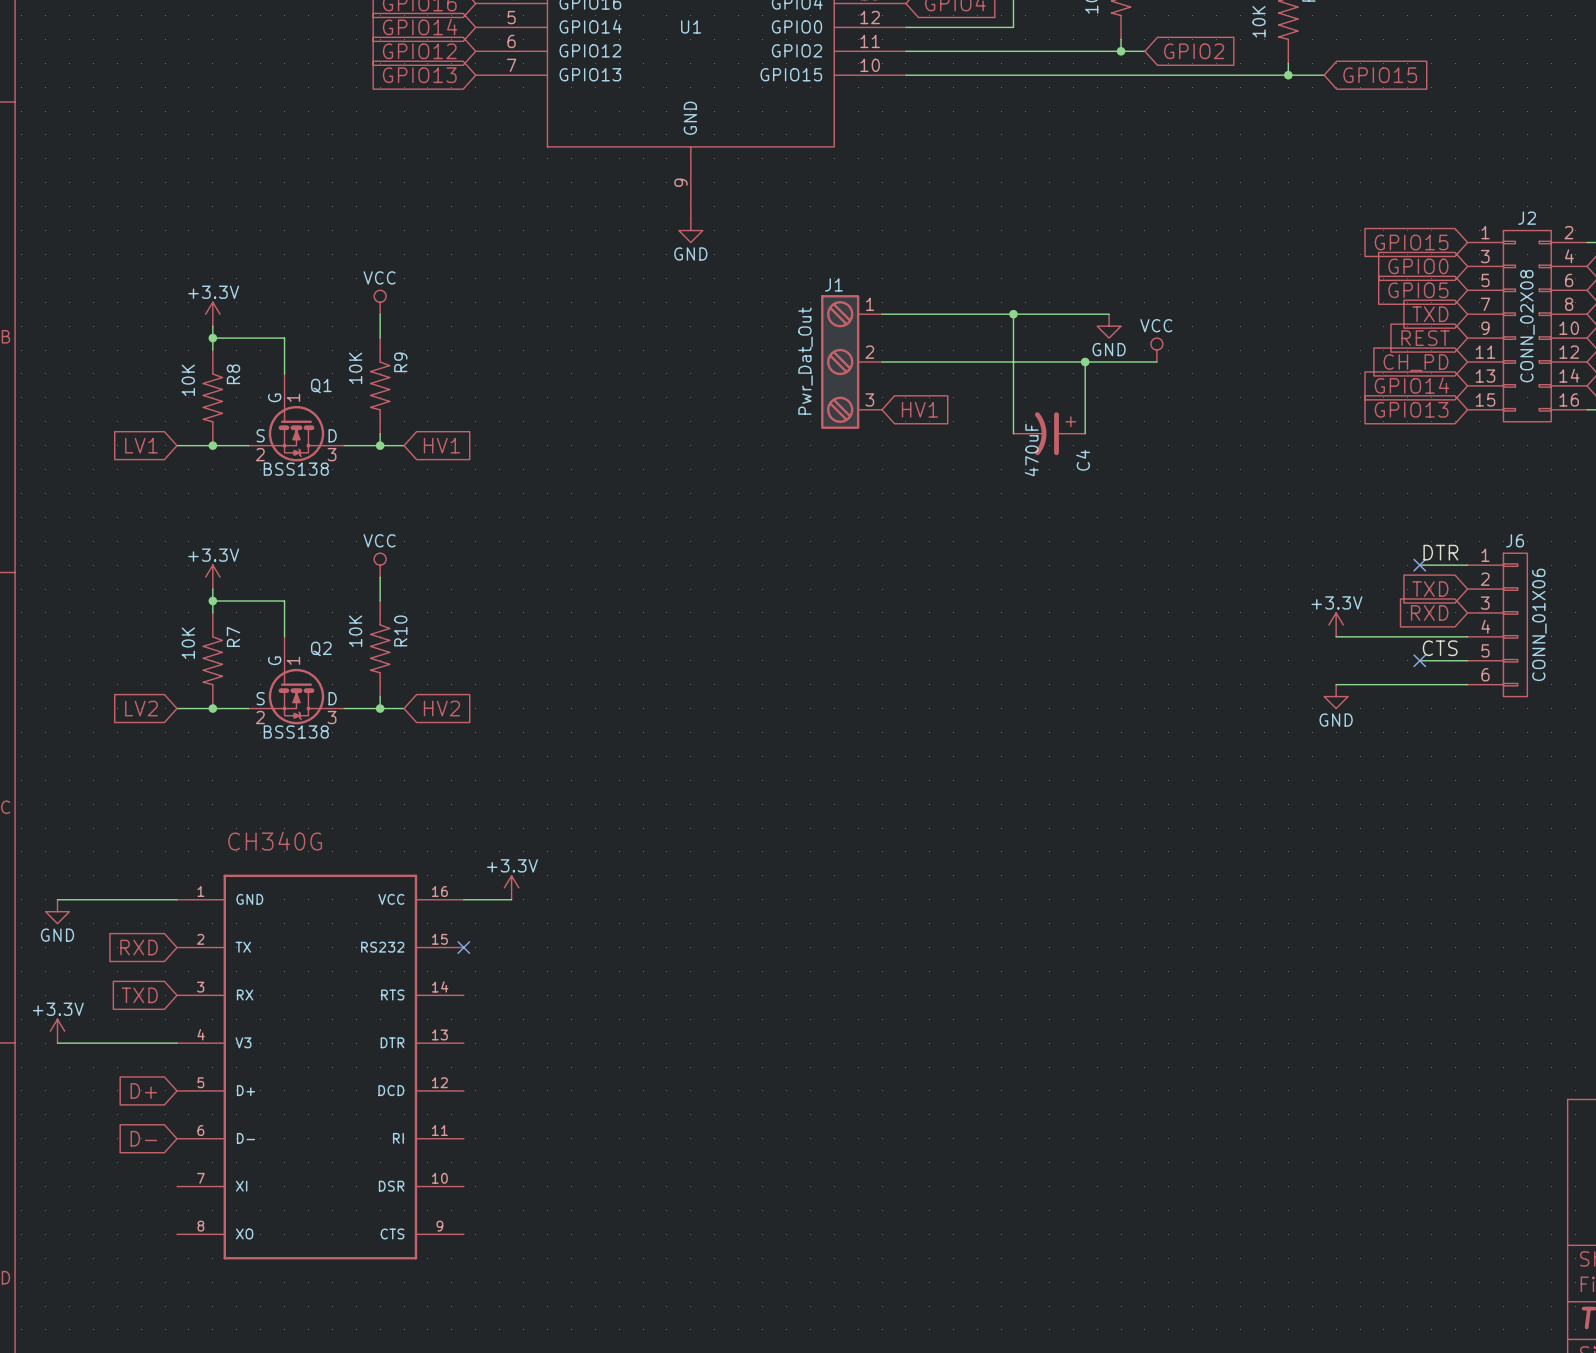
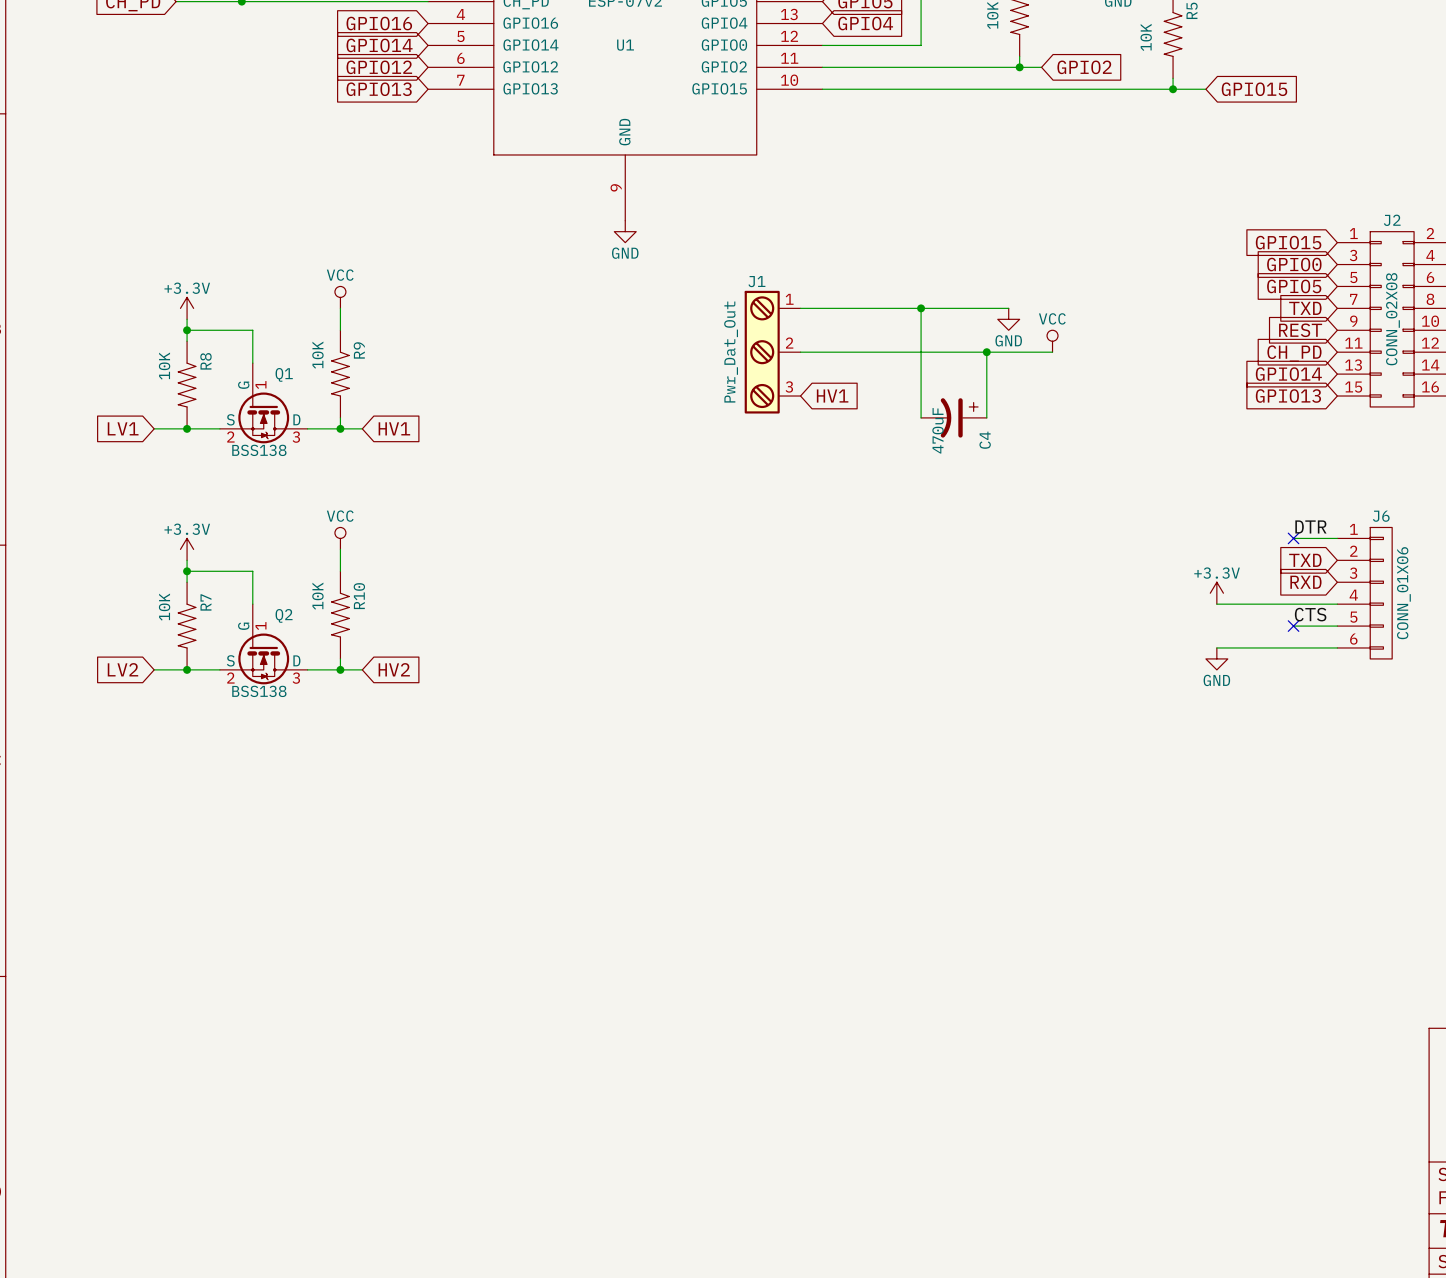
power symbol: +3.3V (511, 887) -> none
wire: (57, 899) (176, 899) -> none
wire: (463, 899) (511, 899) -> none
power symbol: GND (57, 911) -> none
global label: RXD (139, 947) -> none
no-connect mark: (463, 947) -> none
global label: TXD (139, 995) -> none
power symbol: +3.3V (57, 1031) -> none
wire: (57, 1043) (176, 1043) -> none
part: (320, 1067) -> none
global label: D+ (143, 1090) -> none
global label: D- (143, 1138) -> none

